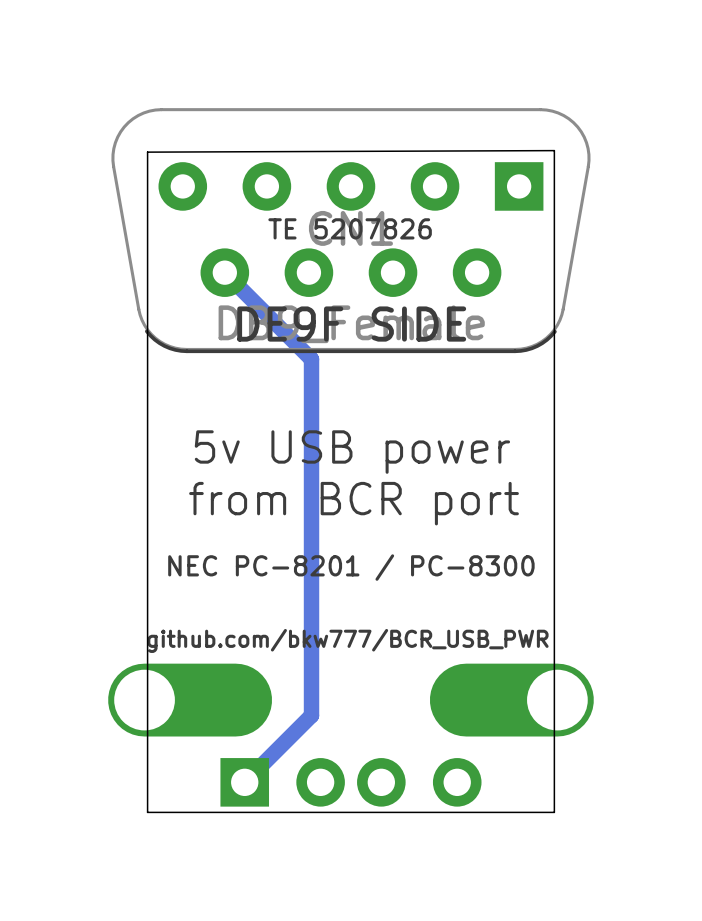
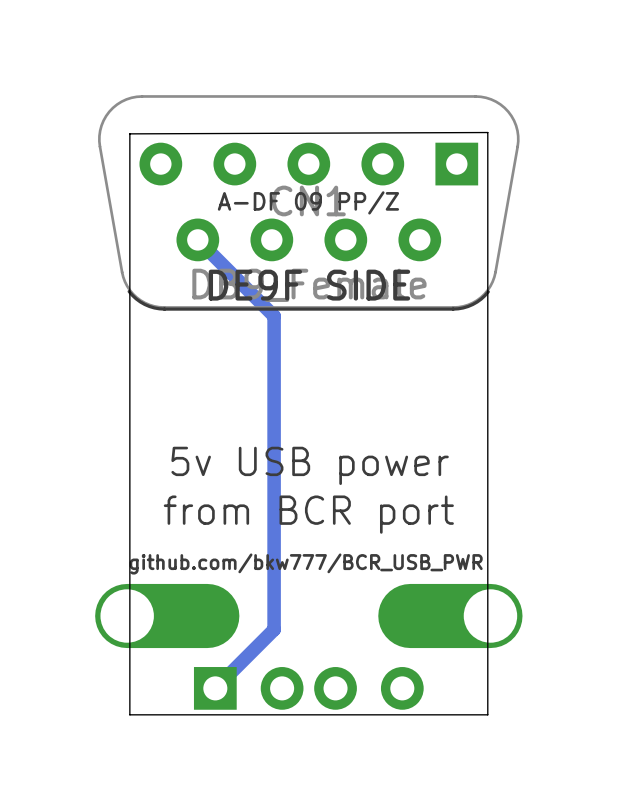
text: TE 5207826 (350, 228) -> A-DF 09 PP/Z (308, 202)
text position: 5v USB power (352, 452) -> 5v USB power (310, 465)
text position: from BCR port (354, 503) -> from BCR port (308, 514)
text: NEC PC-8201 / PC-8300 (351, 567) -> none

